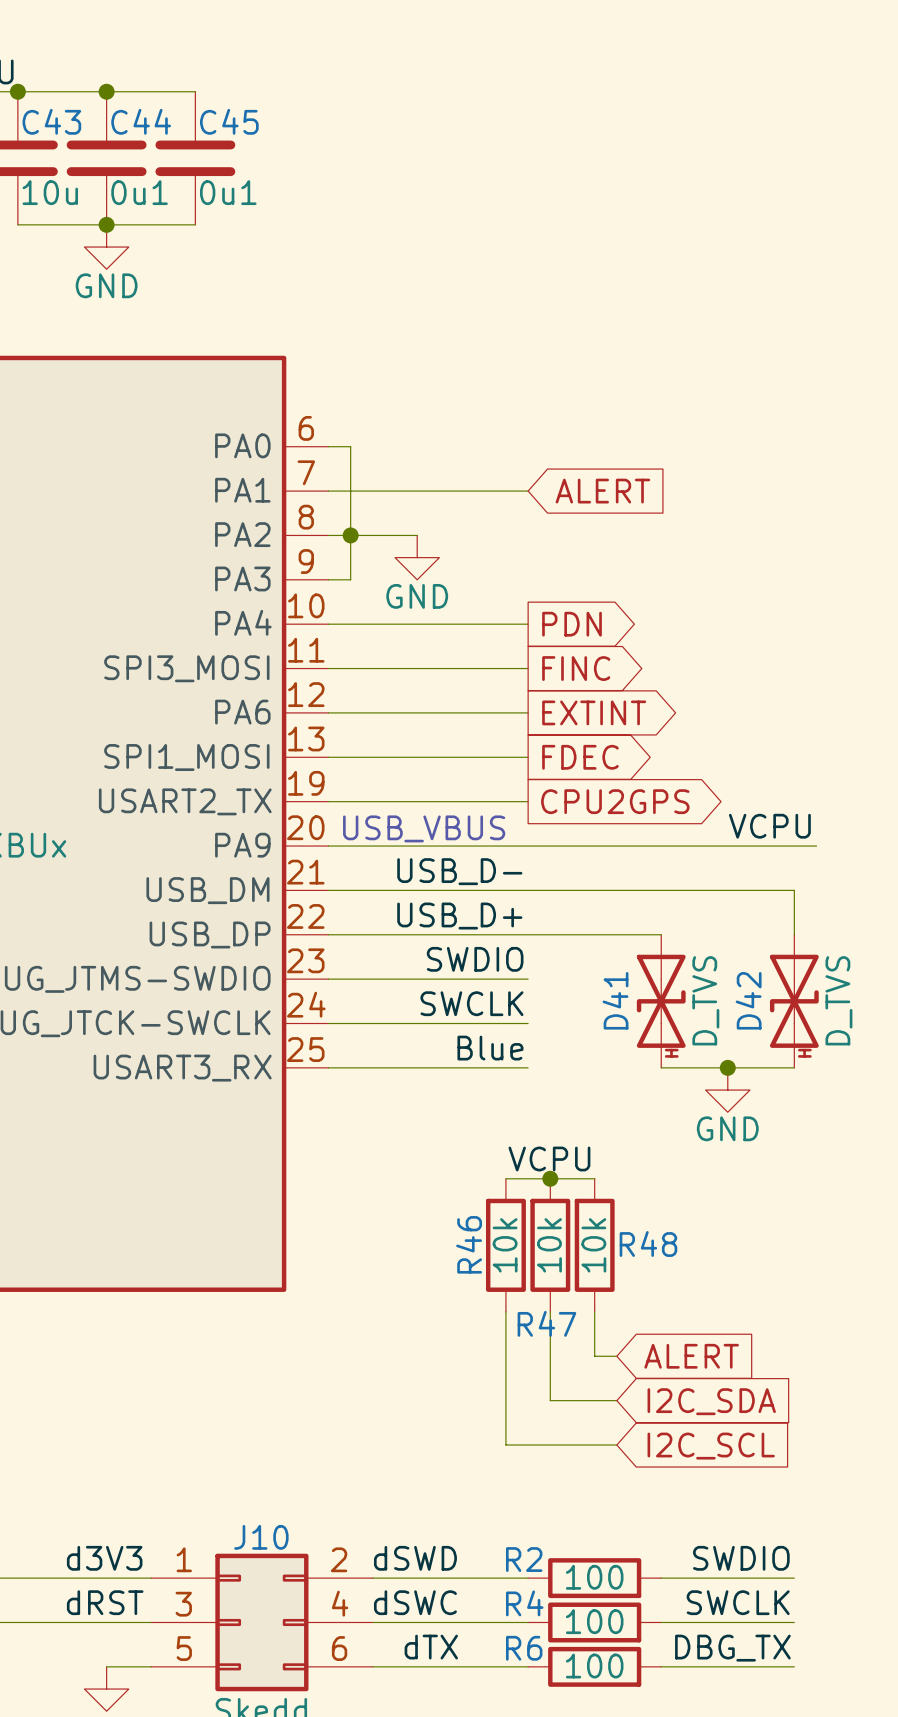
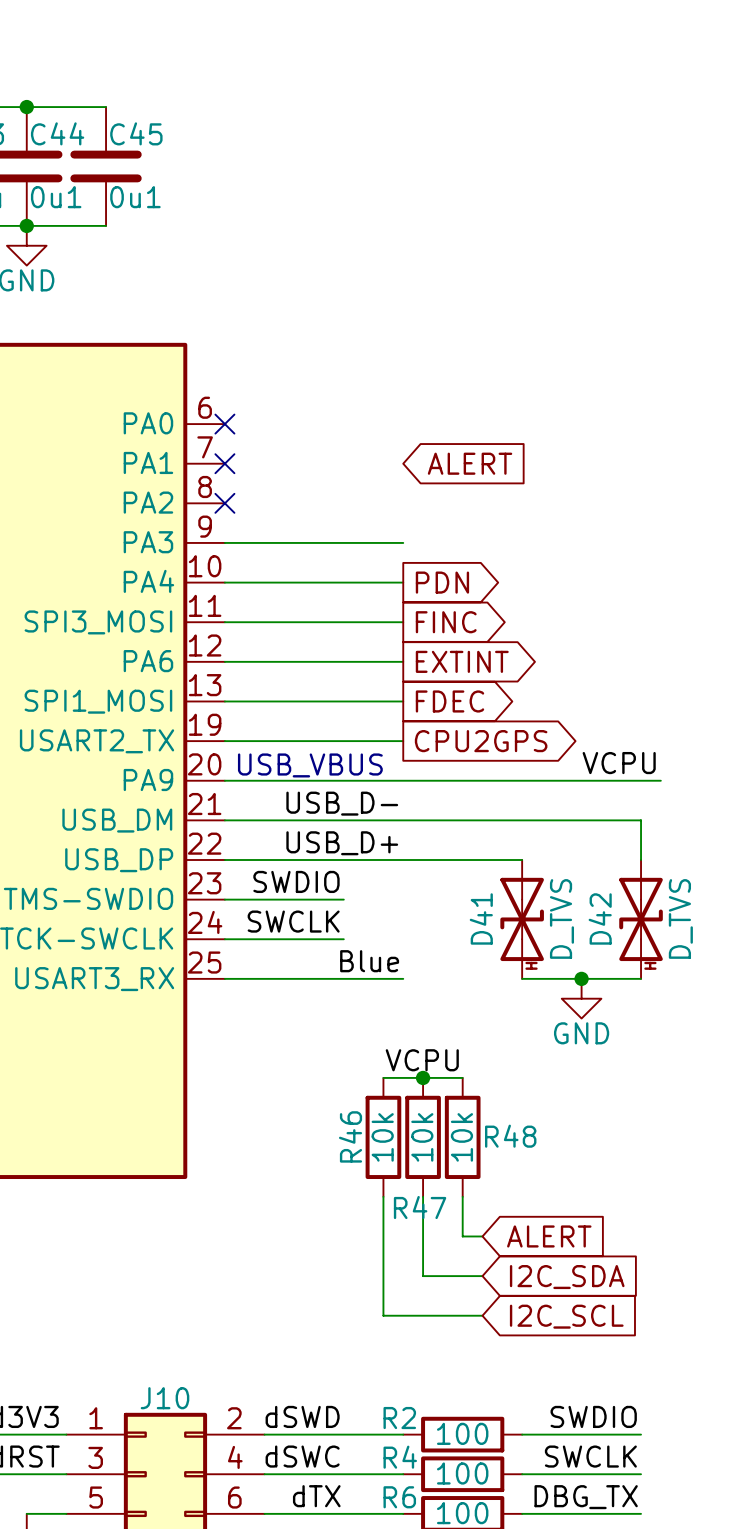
wire: (328, 446) (350, 446) (350, 579) -> (403, 542) (244, 542)
no-connect mark: none -> (224, 424)
wire: (328, 491) (528, 491) -> none
no-connect mark: none -> (224, 463)
wire: (328, 535) (417, 535) -> none
no-connect mark: none -> (224, 503)
junction: (350, 535) -> none
power symbol: GND (417, 557) -> none
label position: SWDIO (475, 959) -> SWDIO (296, 881)
wire: (461, 979) (528, 979) -> none
label position: SWCLK (471, 1003) -> SWCLK (293, 921)
wire: (461, 1023) (528, 1023) -> none

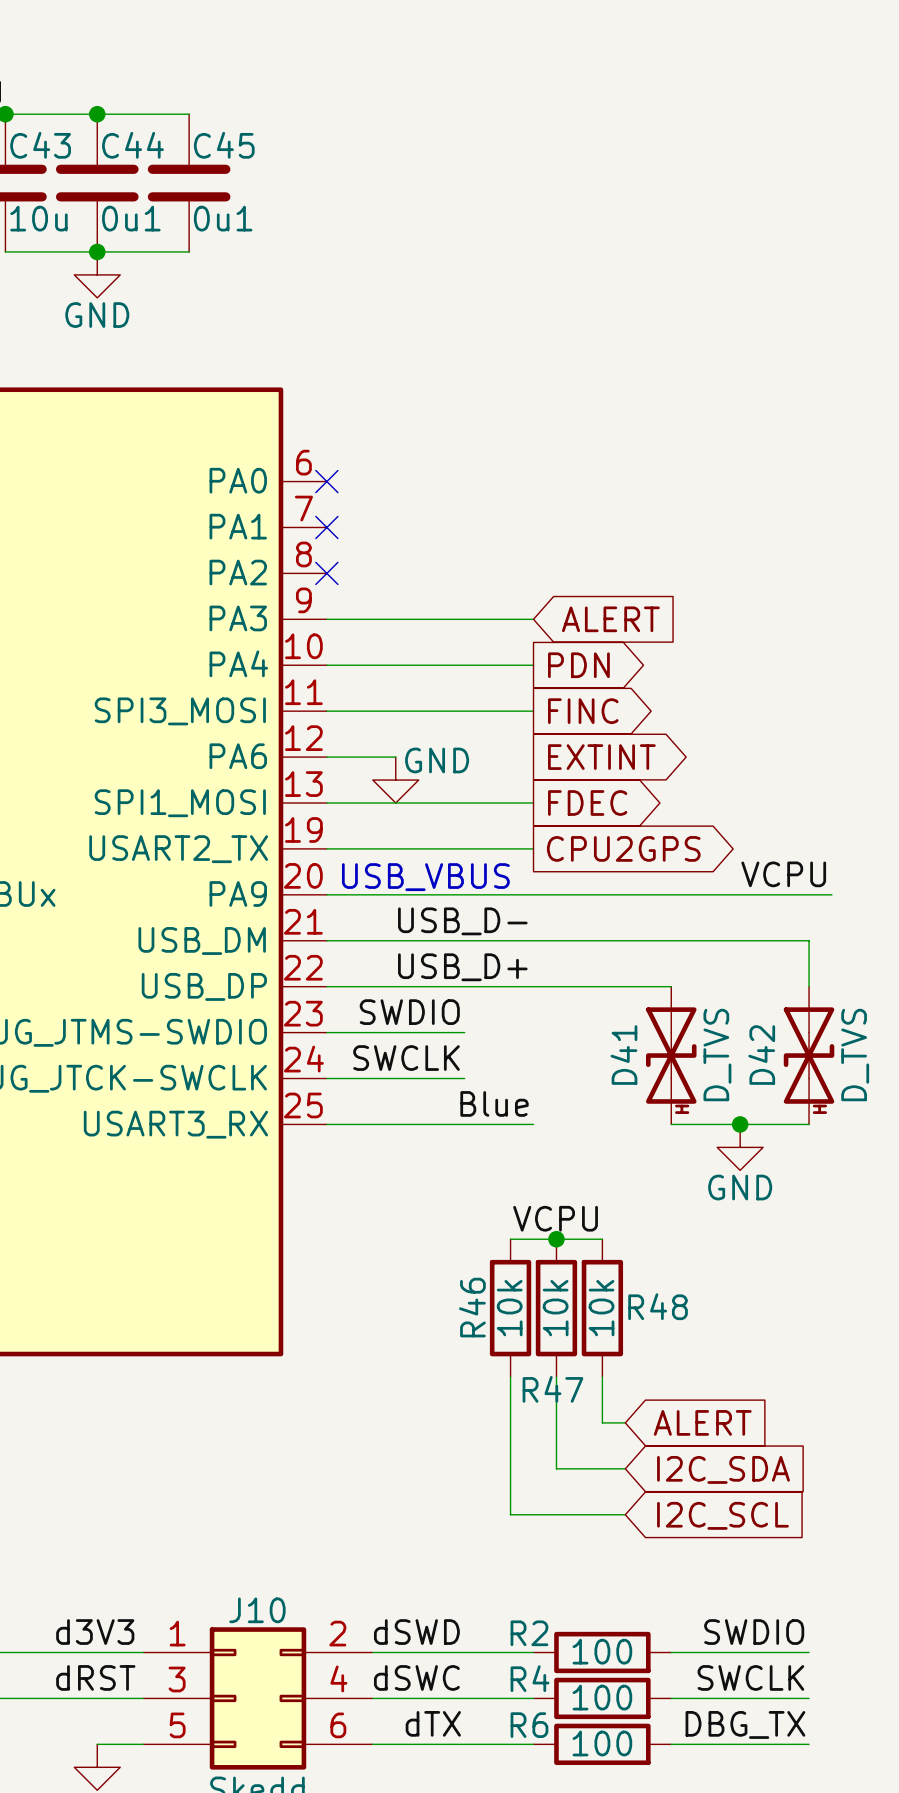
global label position: ALERT (470, 463) -> ALERT (610, 619)
wire: (284, 661) (403, 661) -> none
power symbol: none -> GND (395, 780)

